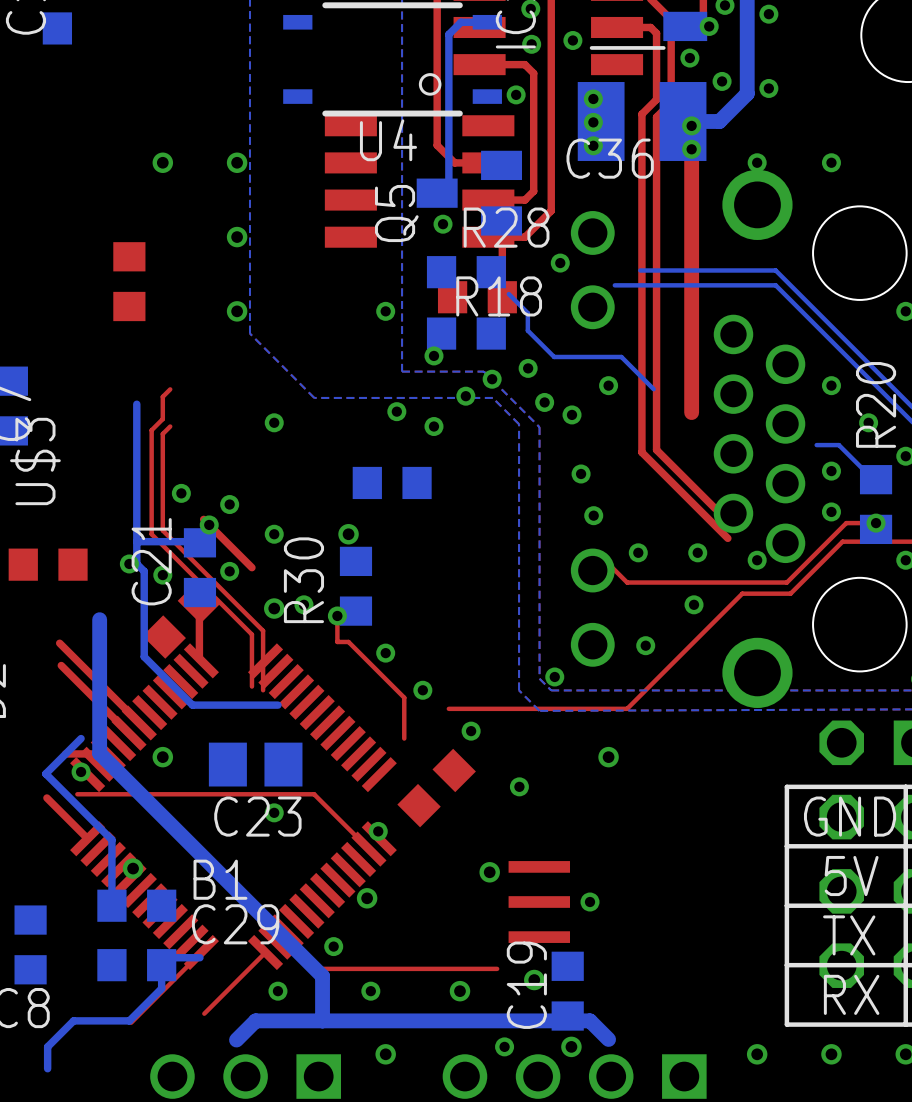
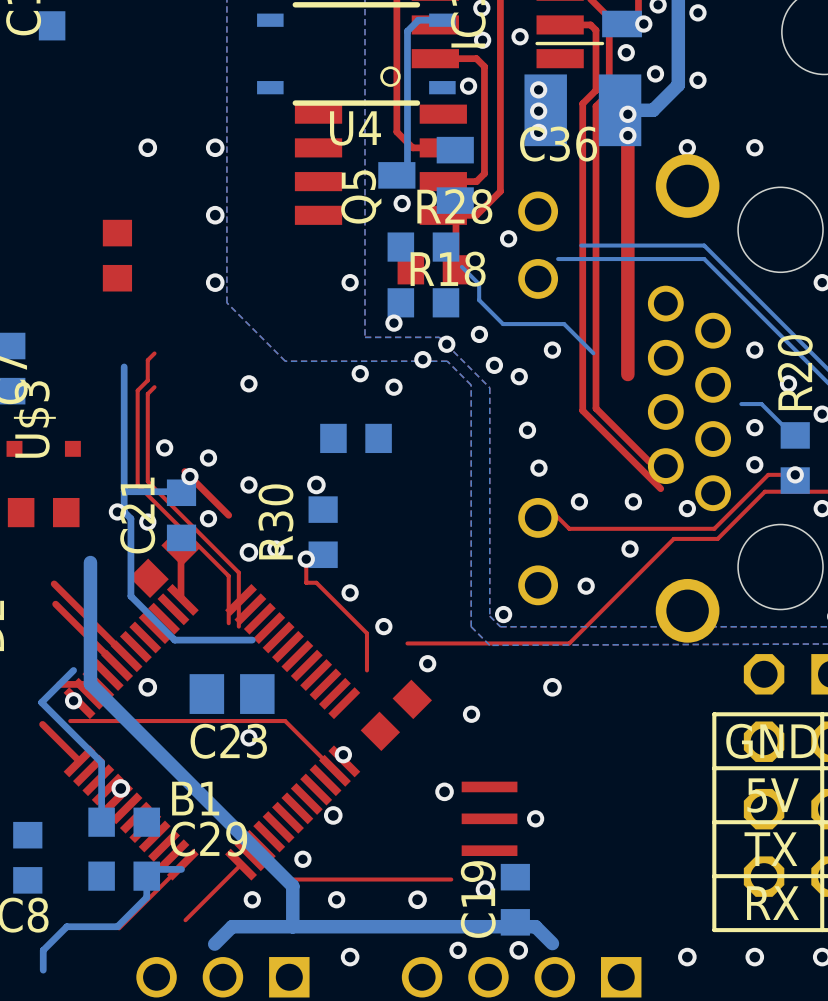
part: none -> (43, 448)

